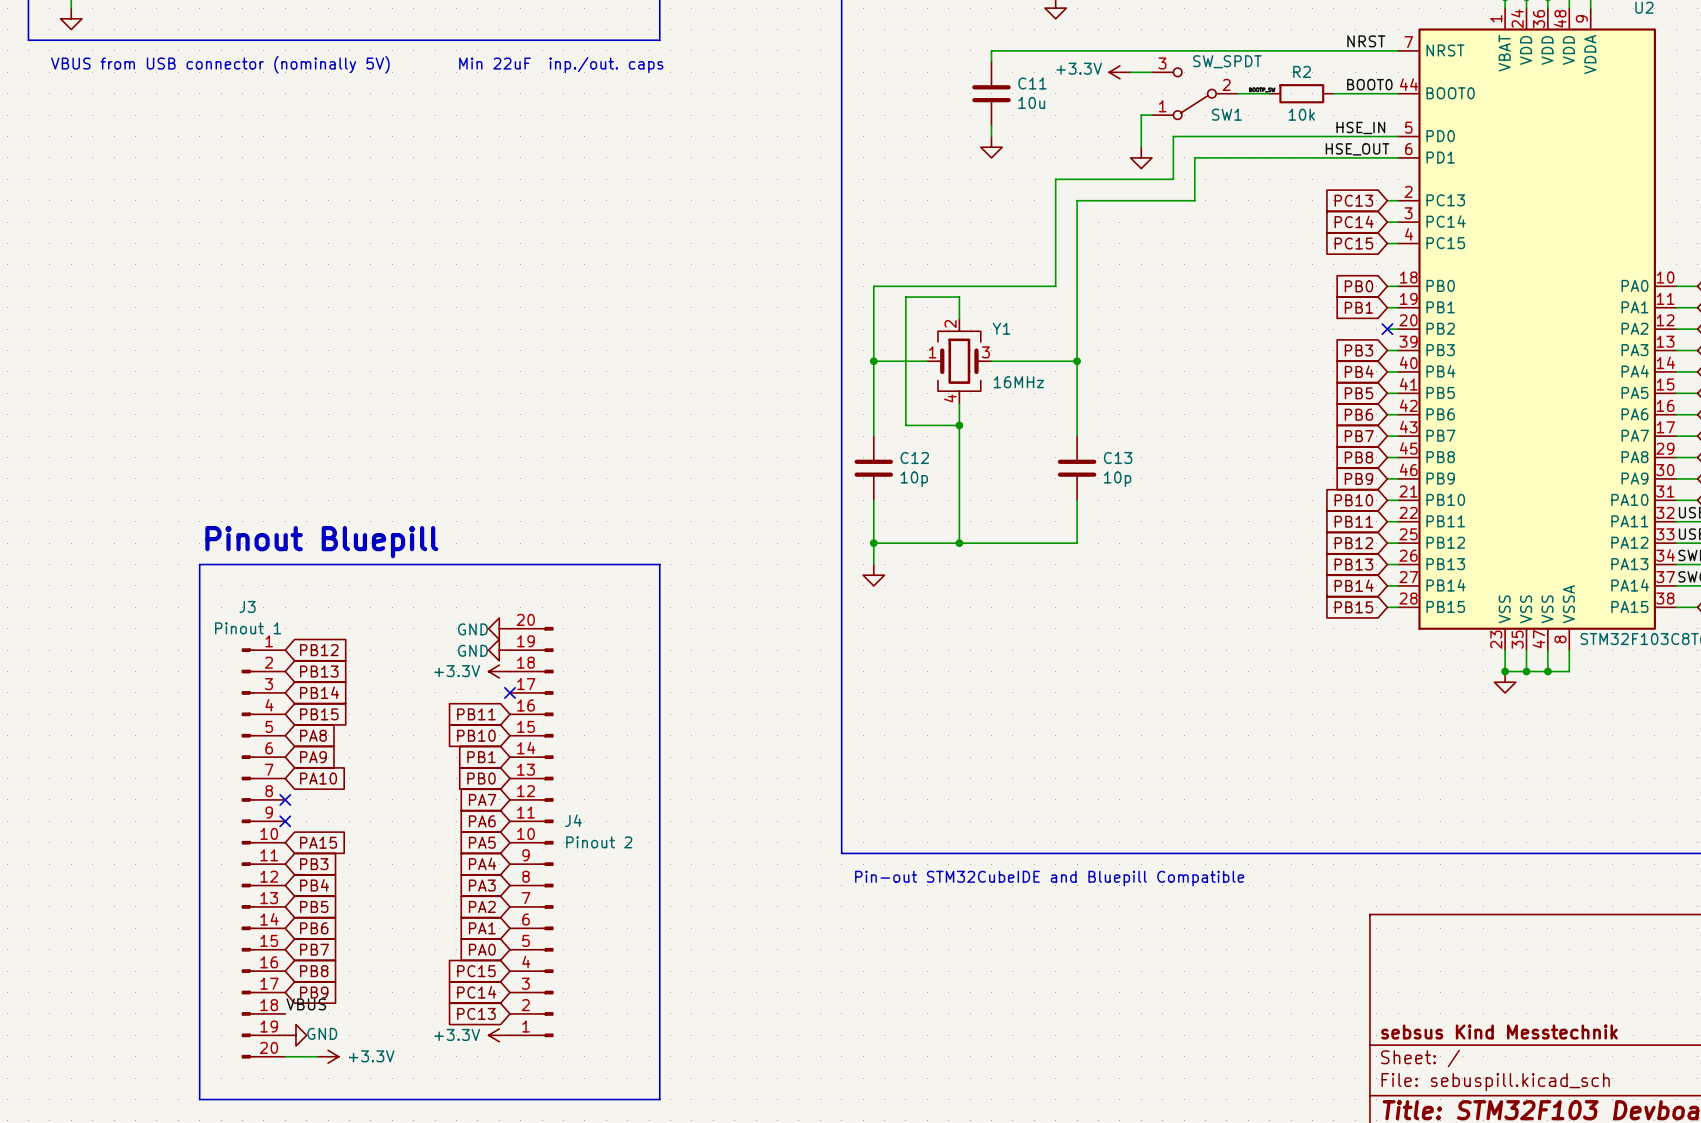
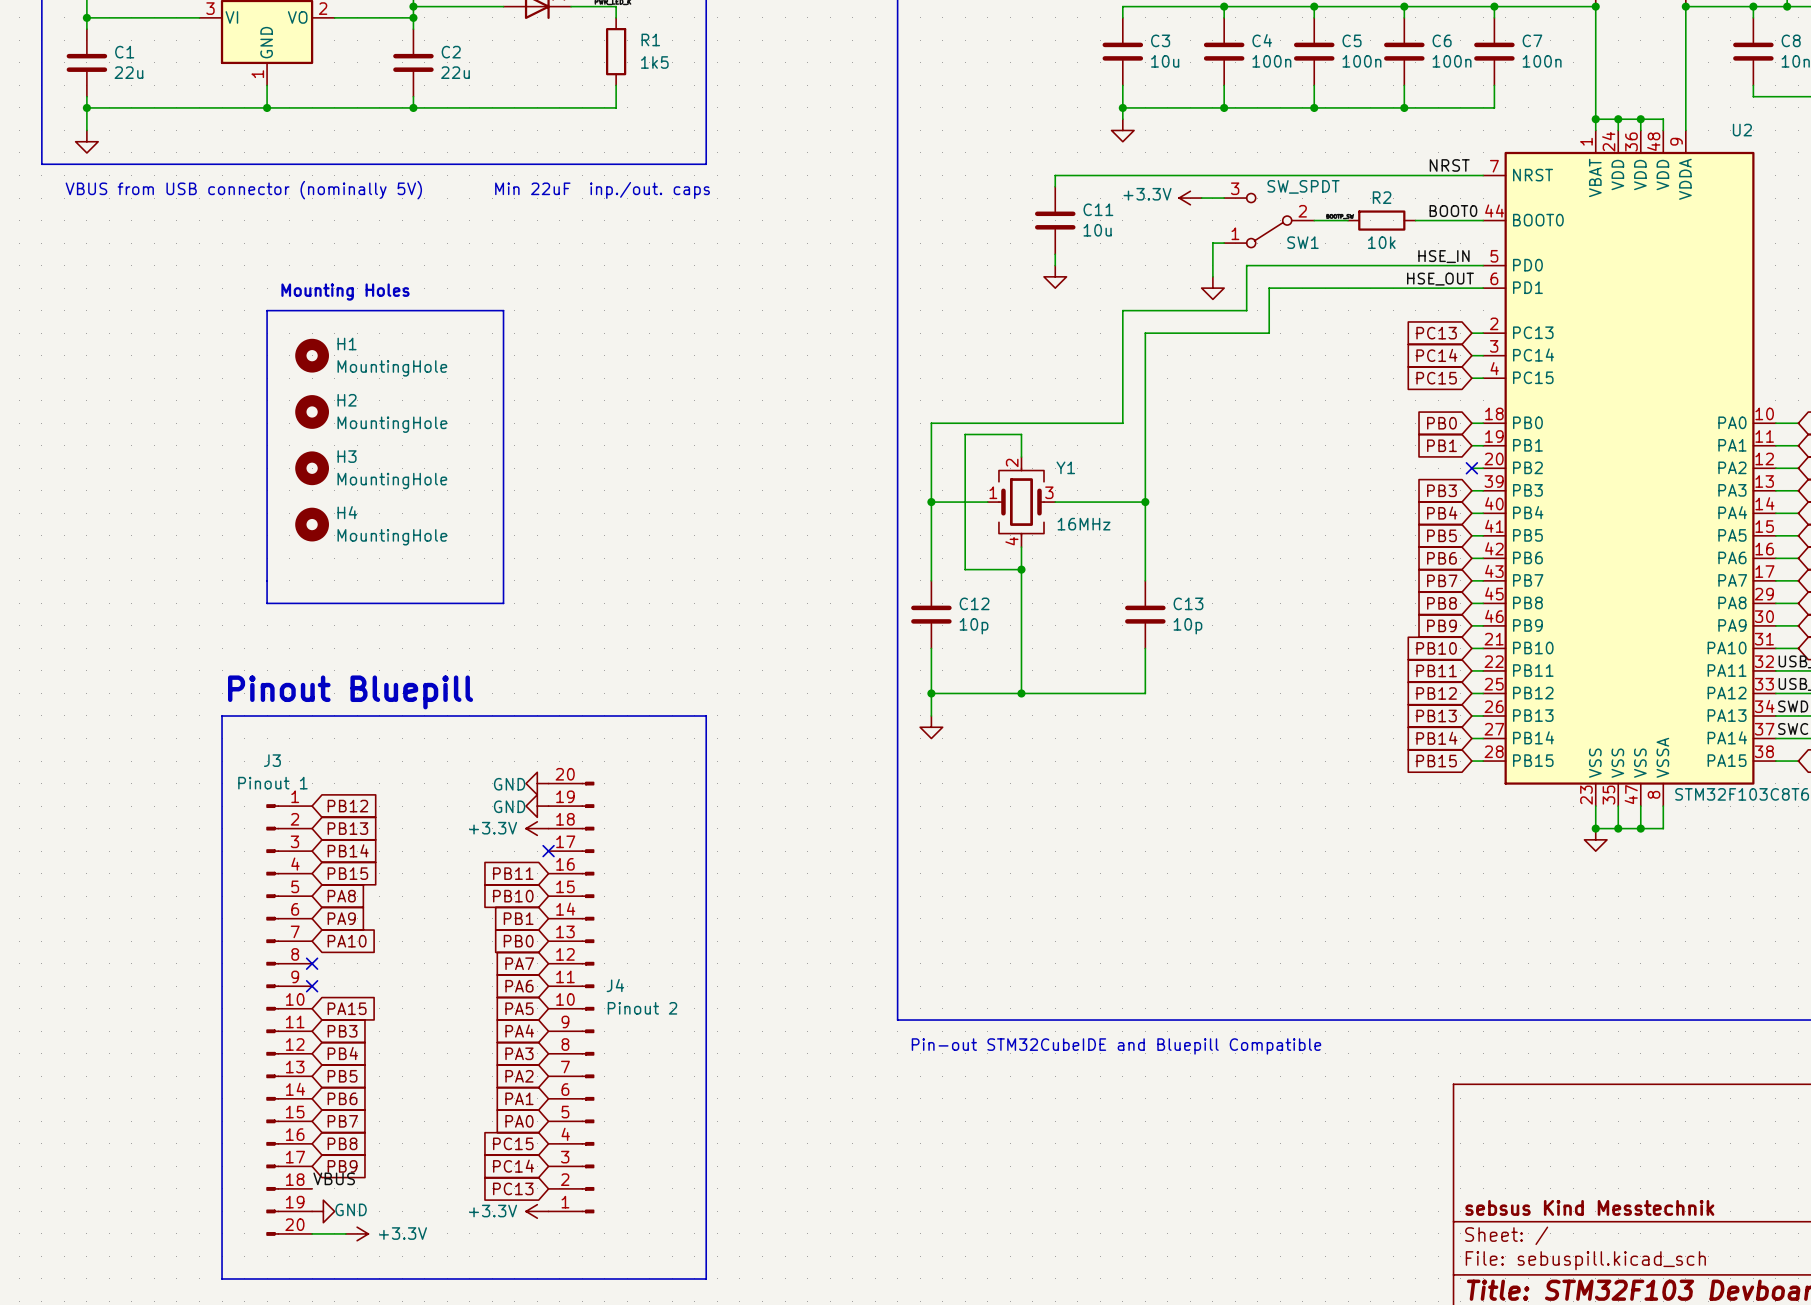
text: none -> Mounting Holes (345, 292)
line: none -> (267, 310) (267, 603) (503, 603) (503, 310) (267, 310)
H1: none -> MountingHole (312, 355)
H2: none -> MountingHole (312, 411)
H3: none -> MountingHole (312, 468)
H4: none -> MountingHole (312, 524)

